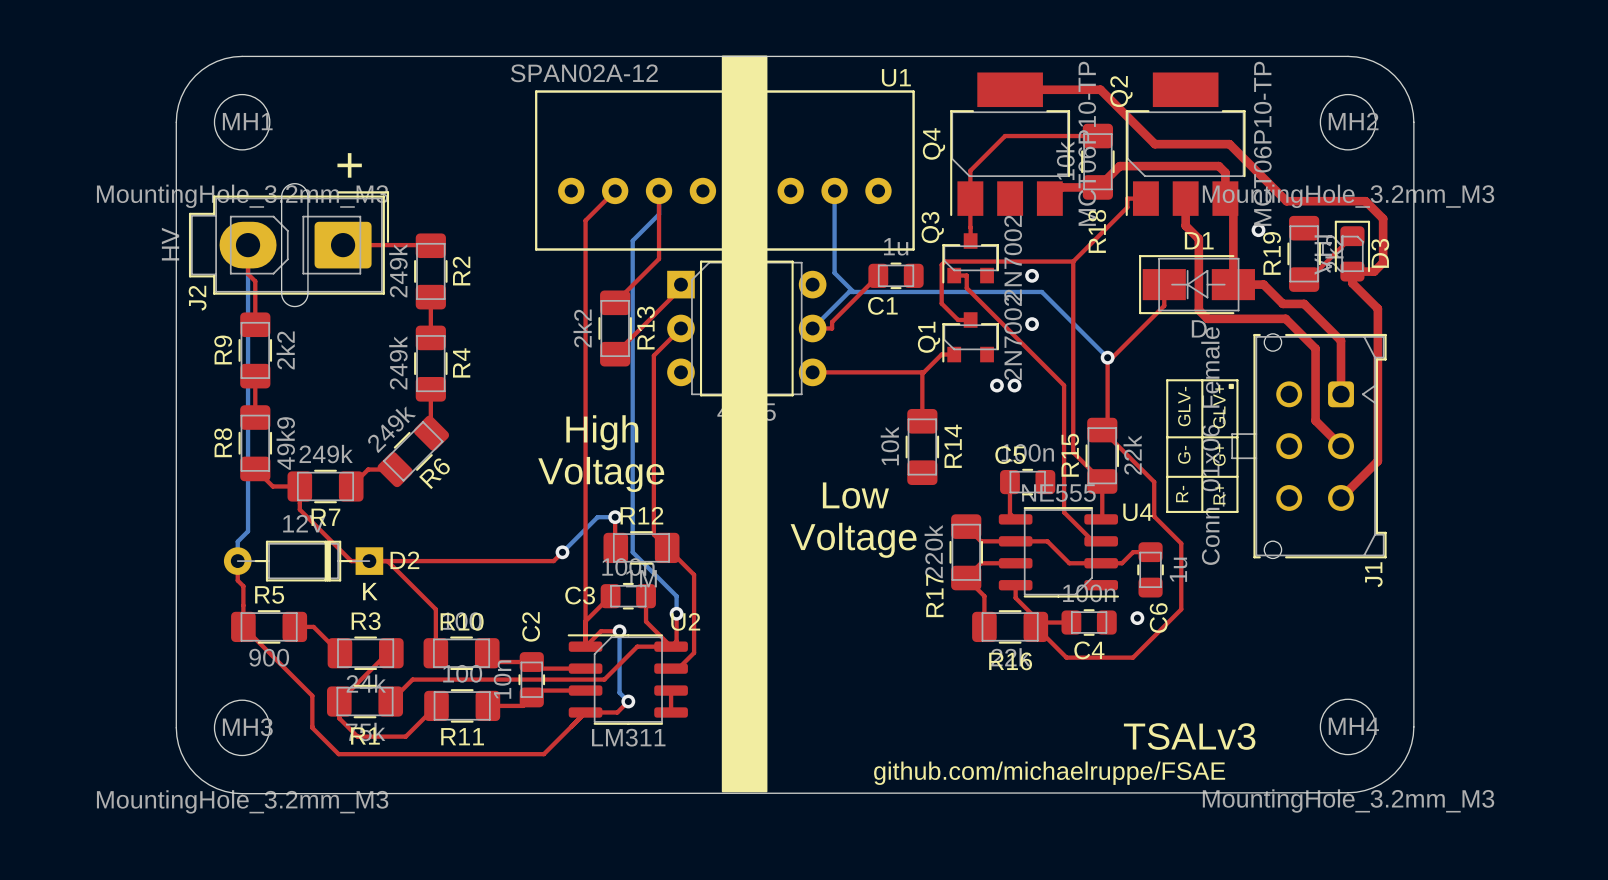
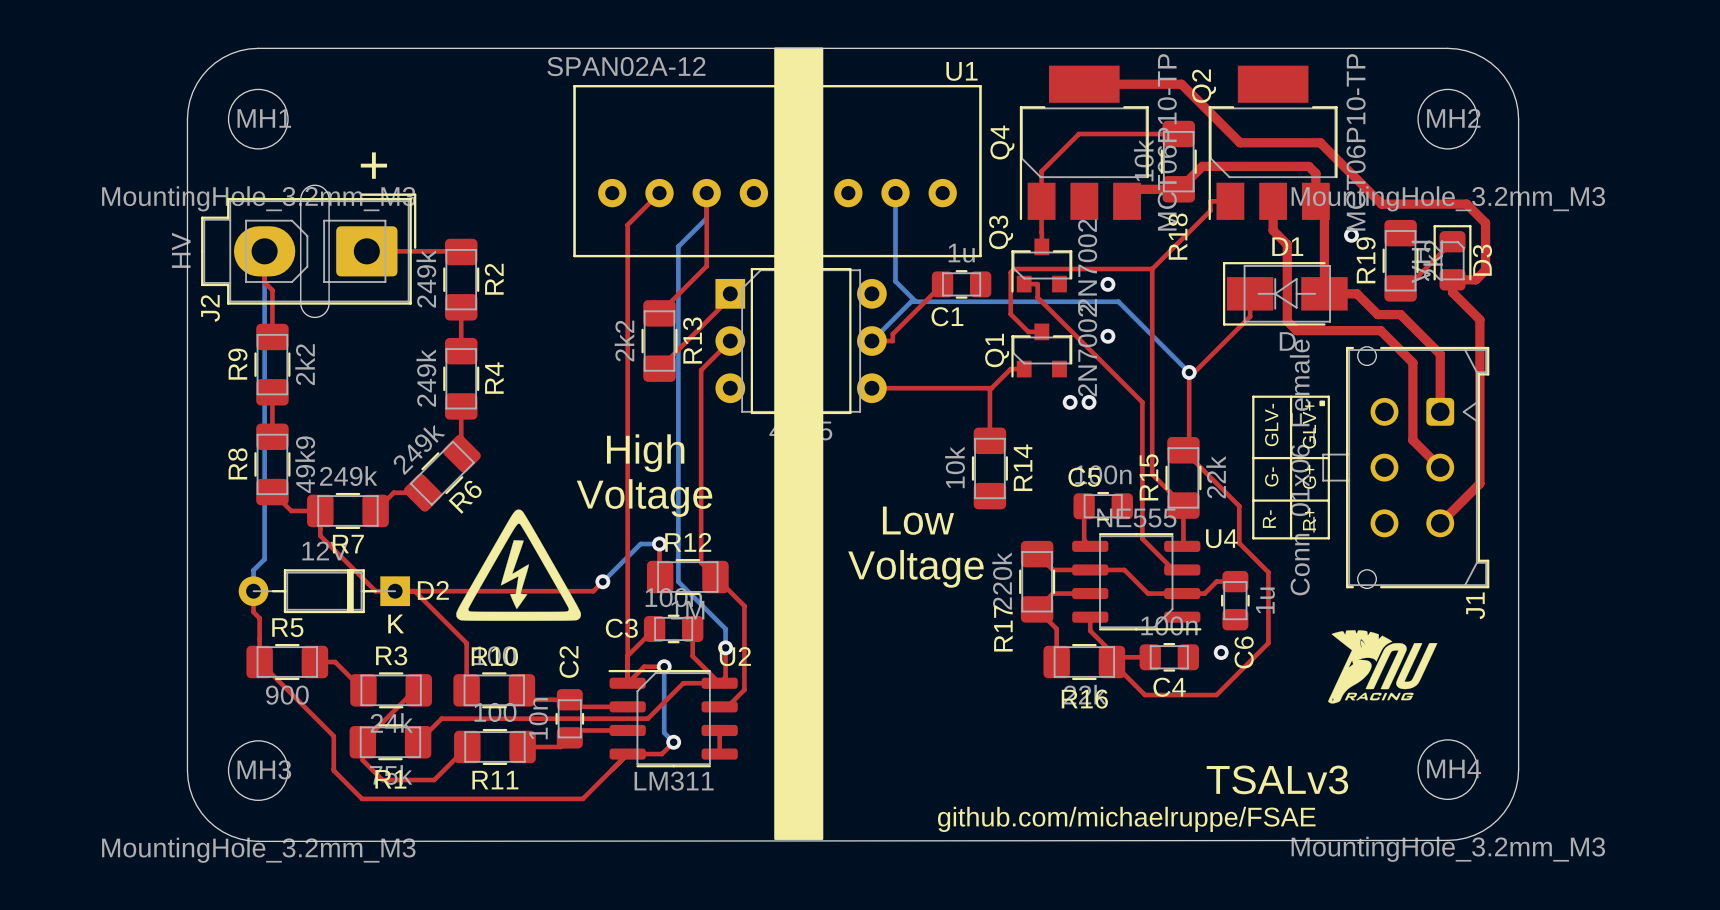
drawing: none -> [456, 509, 581, 621]
drawing: none -> [1328, 630, 1438, 704]

